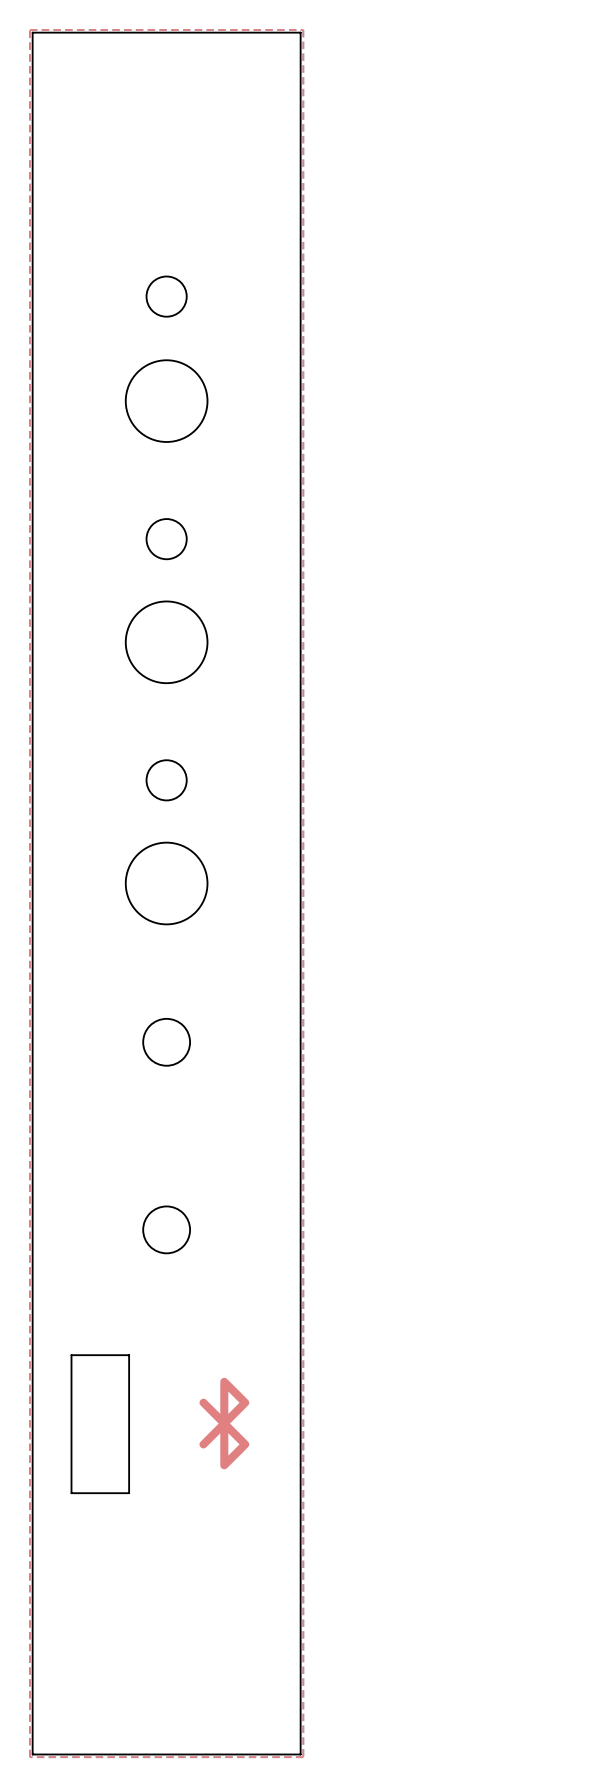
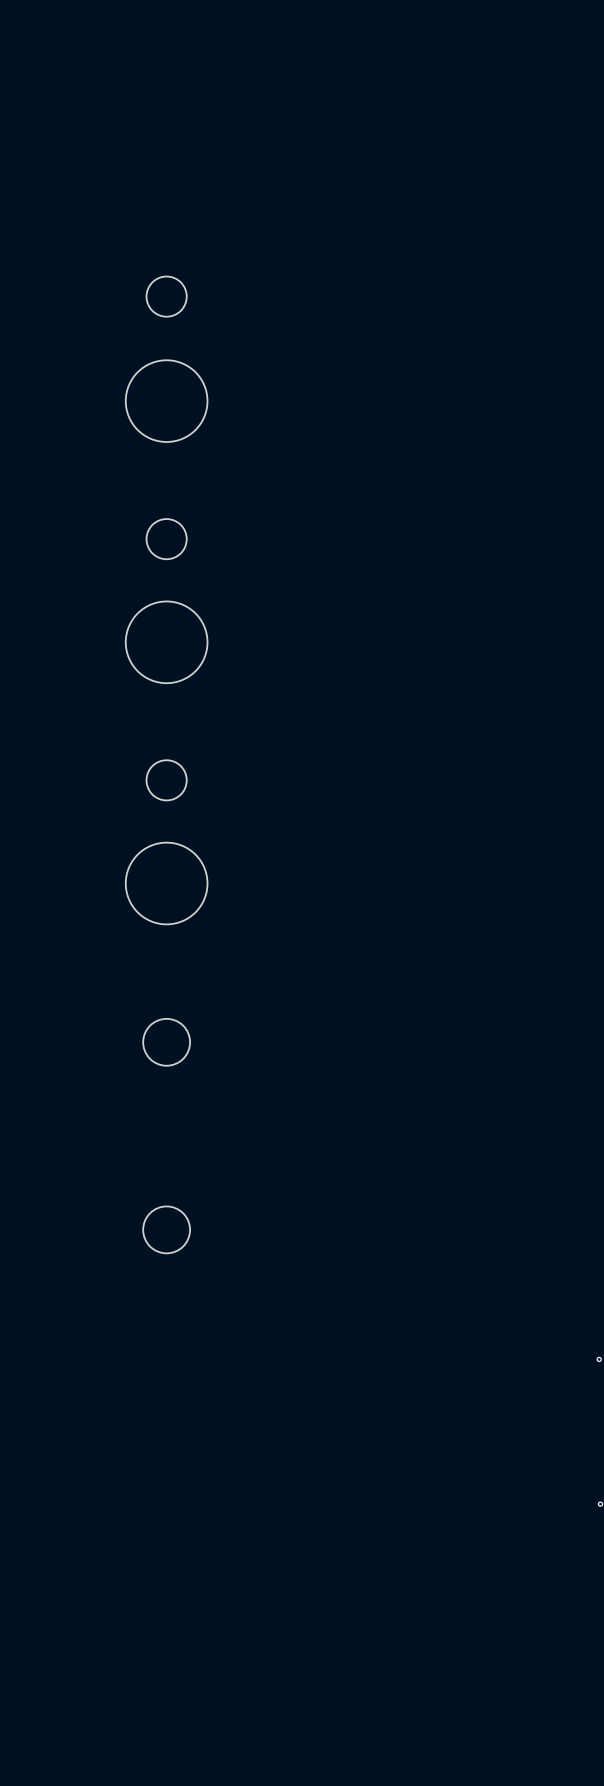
top zone outline: (29, 29) (29, 1757) (303, 1757) (303, 29) (29, 29) -> none
board edge: (32, 32) (300, 32) (300, 1754) (32, 1754) (32, 32) -> none
board edge: (71, 1355) (129, 1355) (129, 1493) (71, 1493) (71, 1355) -> none
via: none -> (599, 1359)
drawing: [199, 1377, 250, 1470] -> none
via: none -> (600, 1504)

